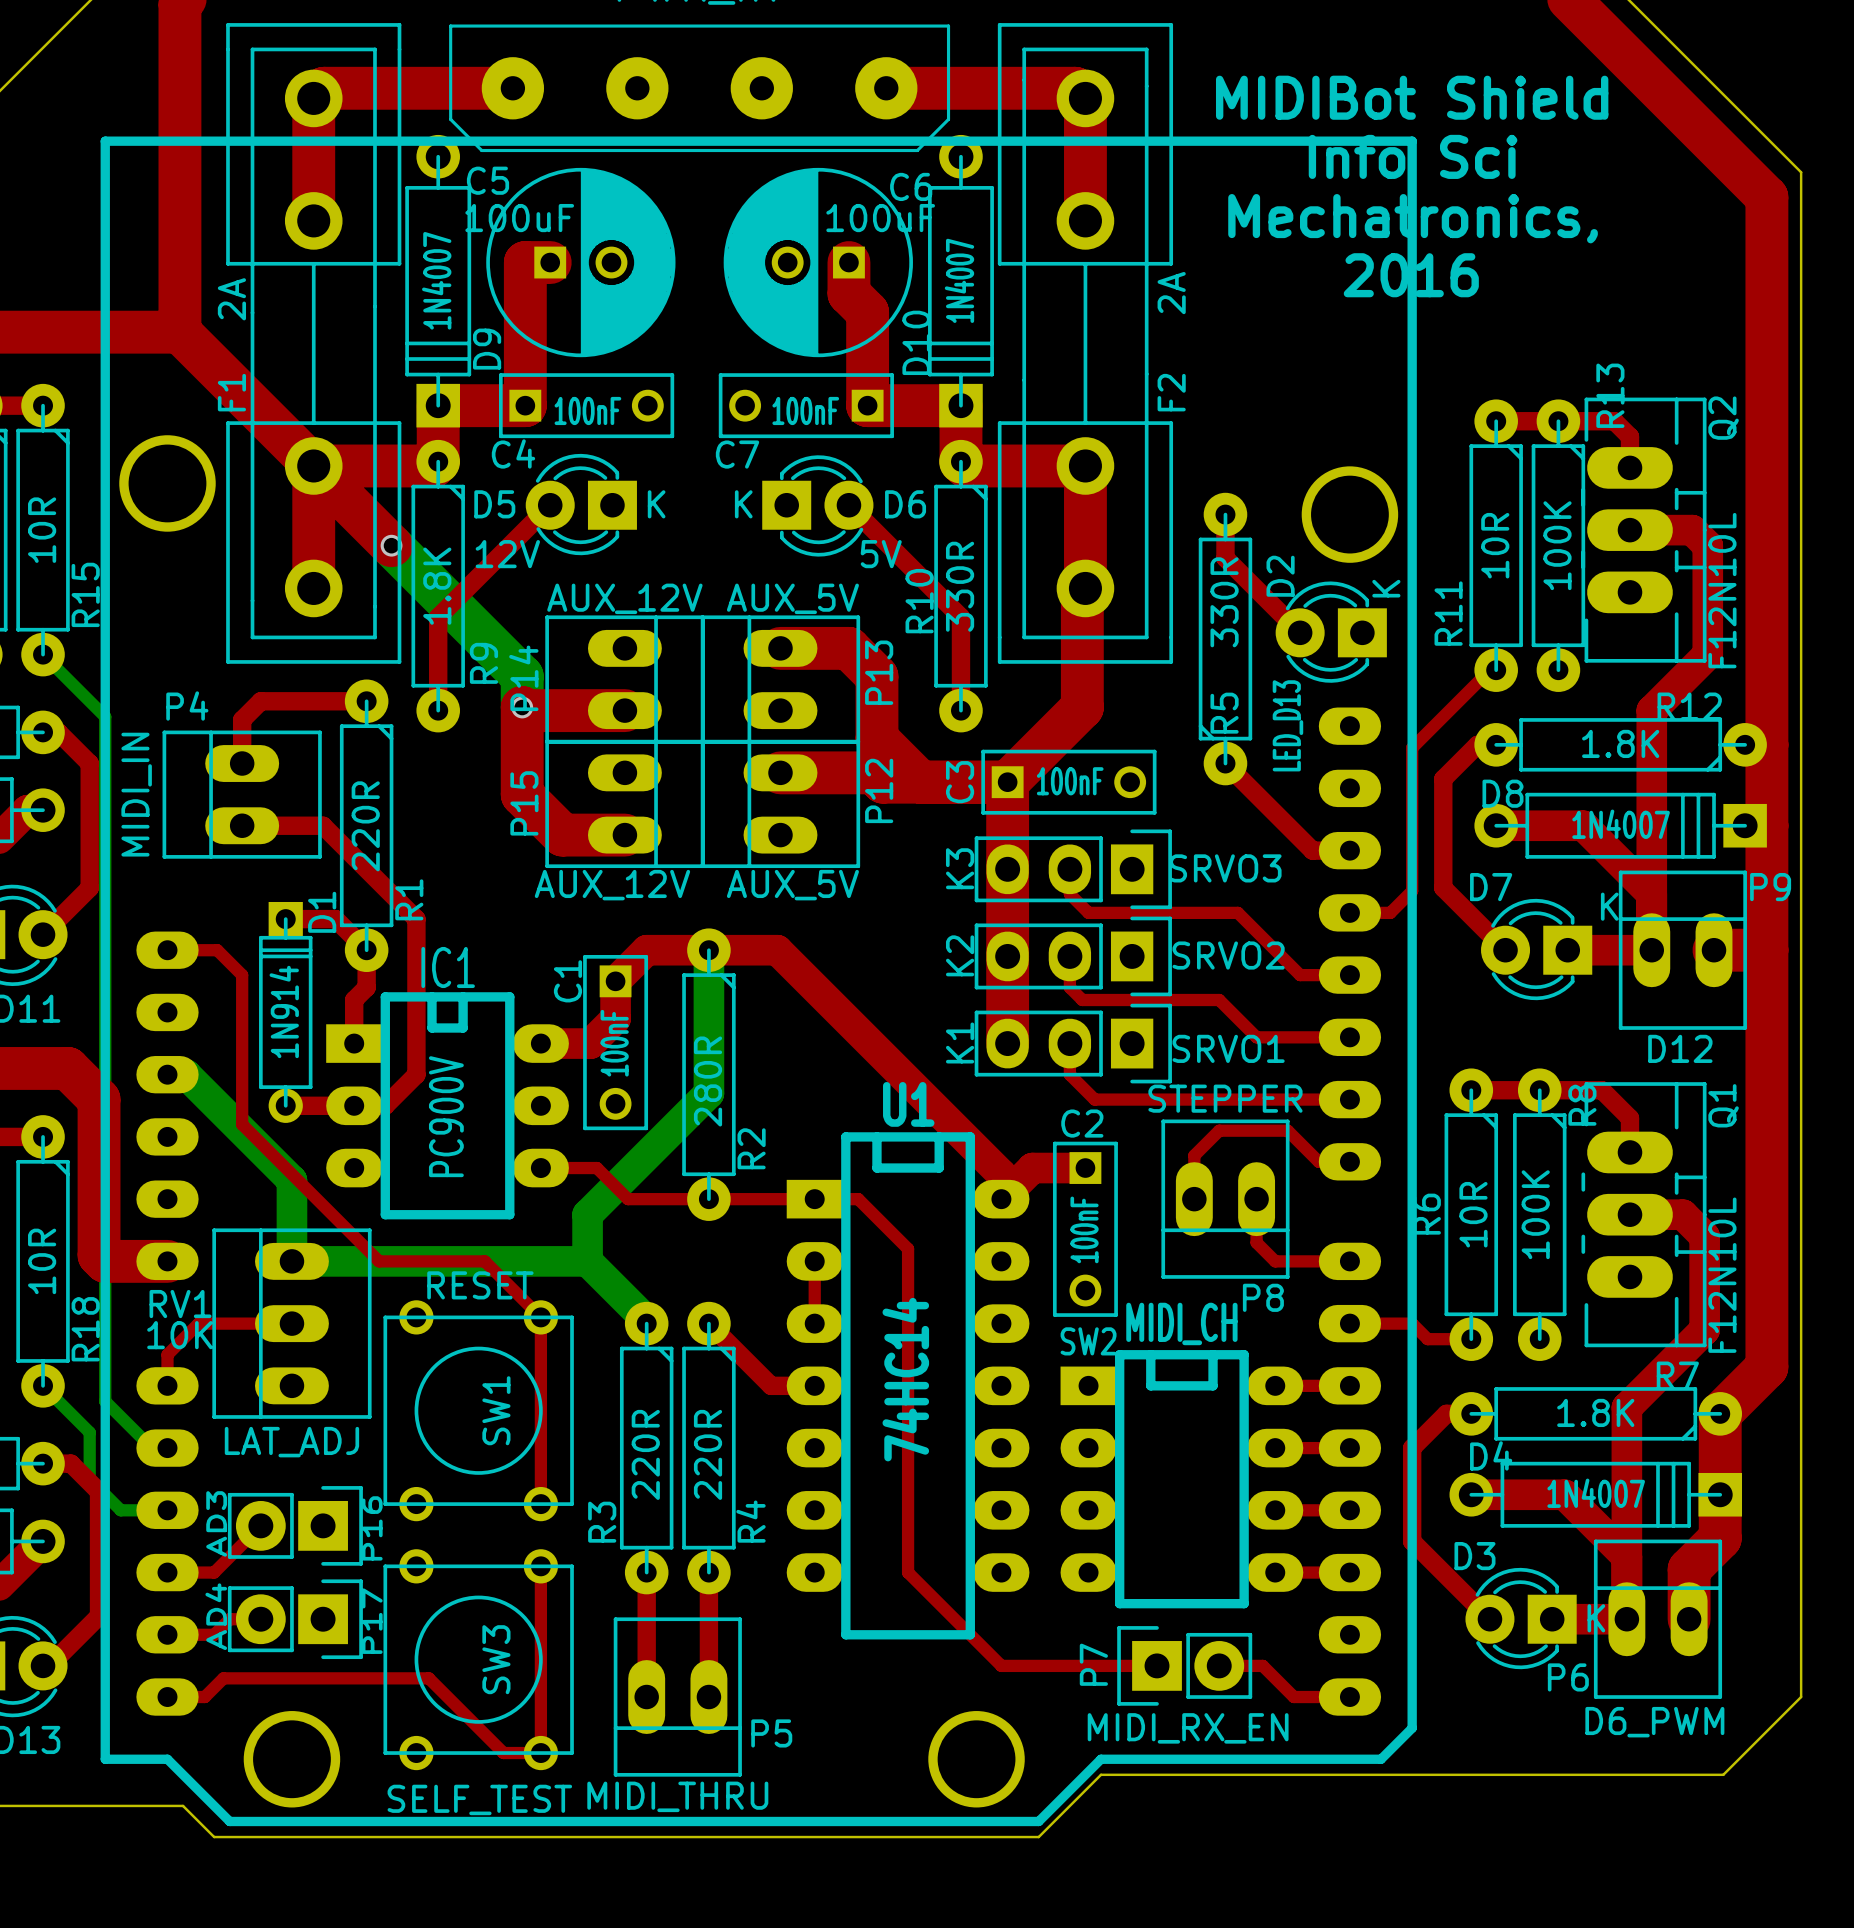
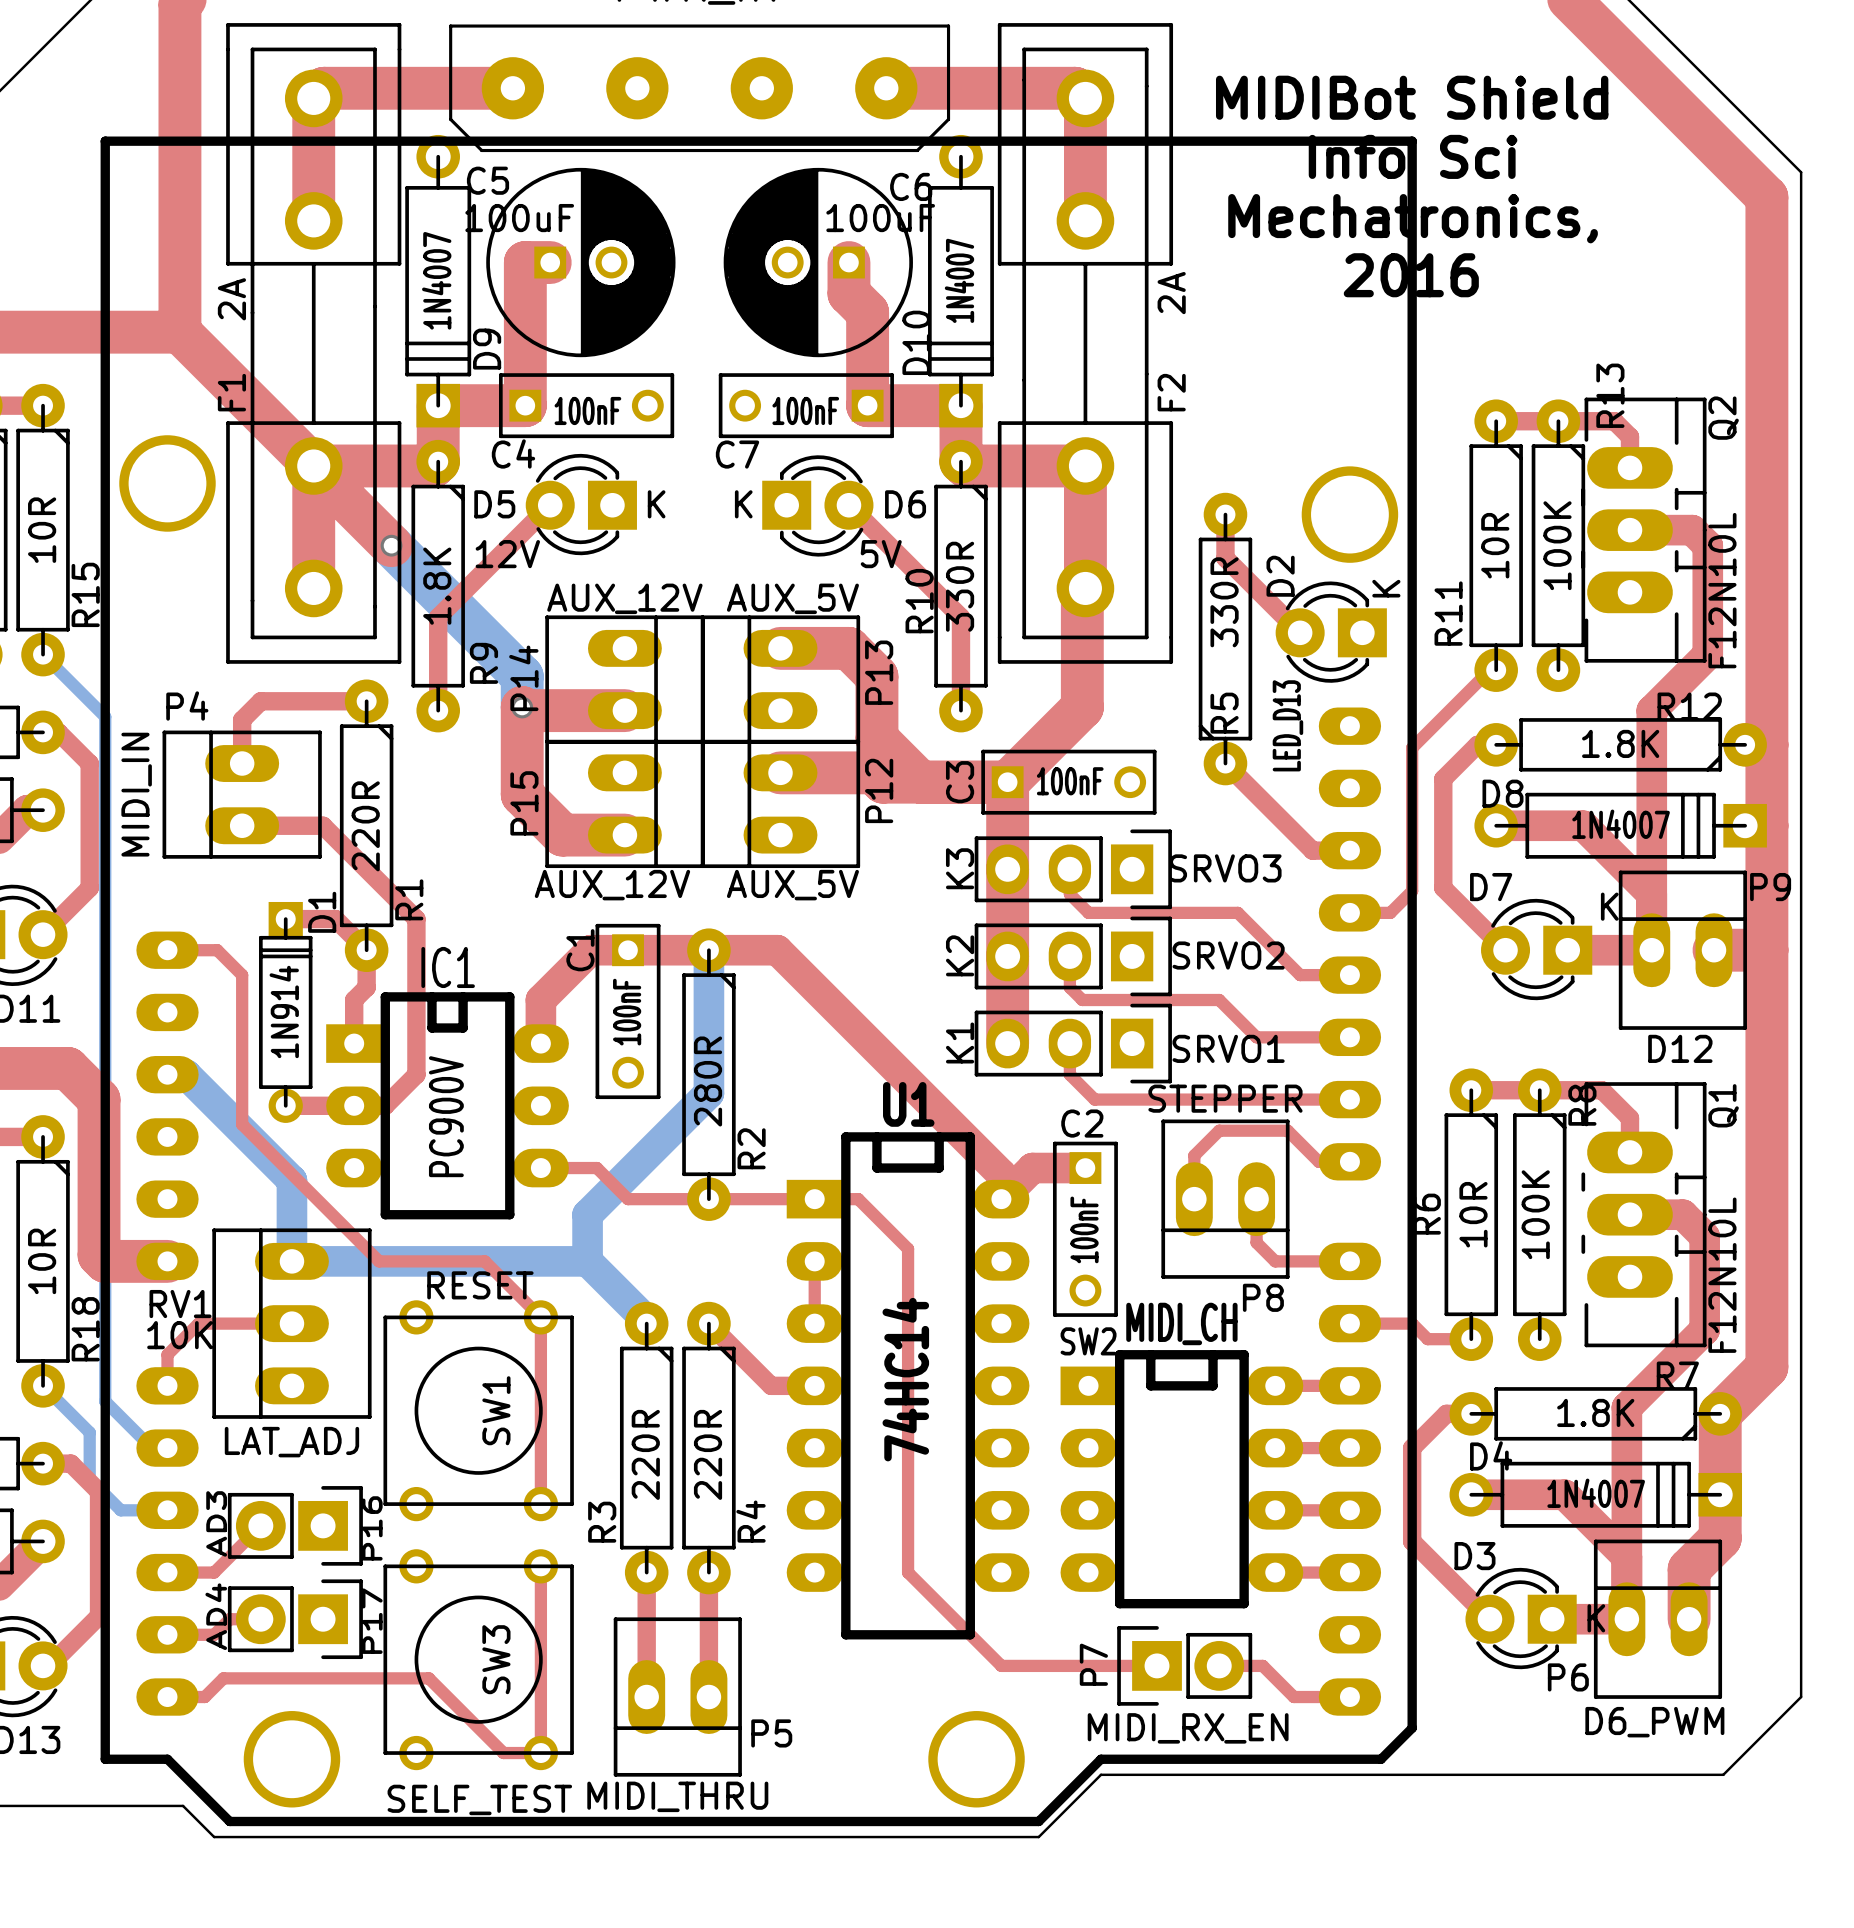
top track: (646, 950) (615, 981) (615, 1018) (590, 1043) (540, 1043) -> (646, 950) (590, 950) (540, 1000) (540, 1043)
C1 position: (615, 1042) -> (628, 1011)

